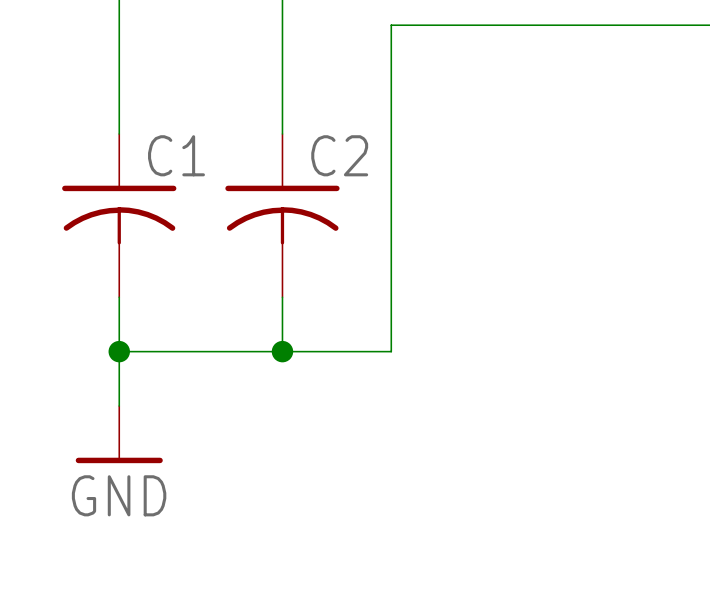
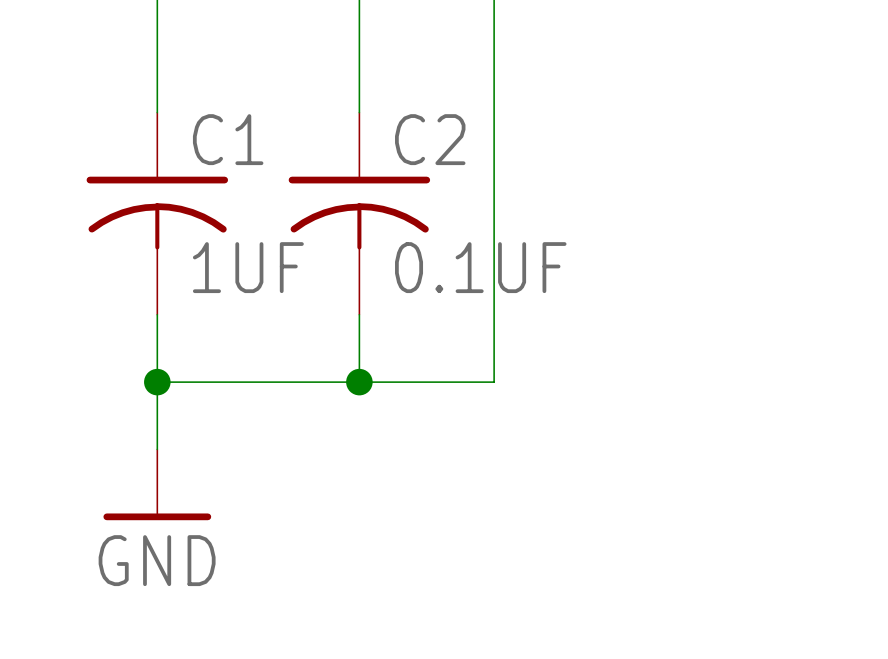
C1 value: none -> 1UF (248, 267)
C2 value: none -> 0.1UF (480, 267)

